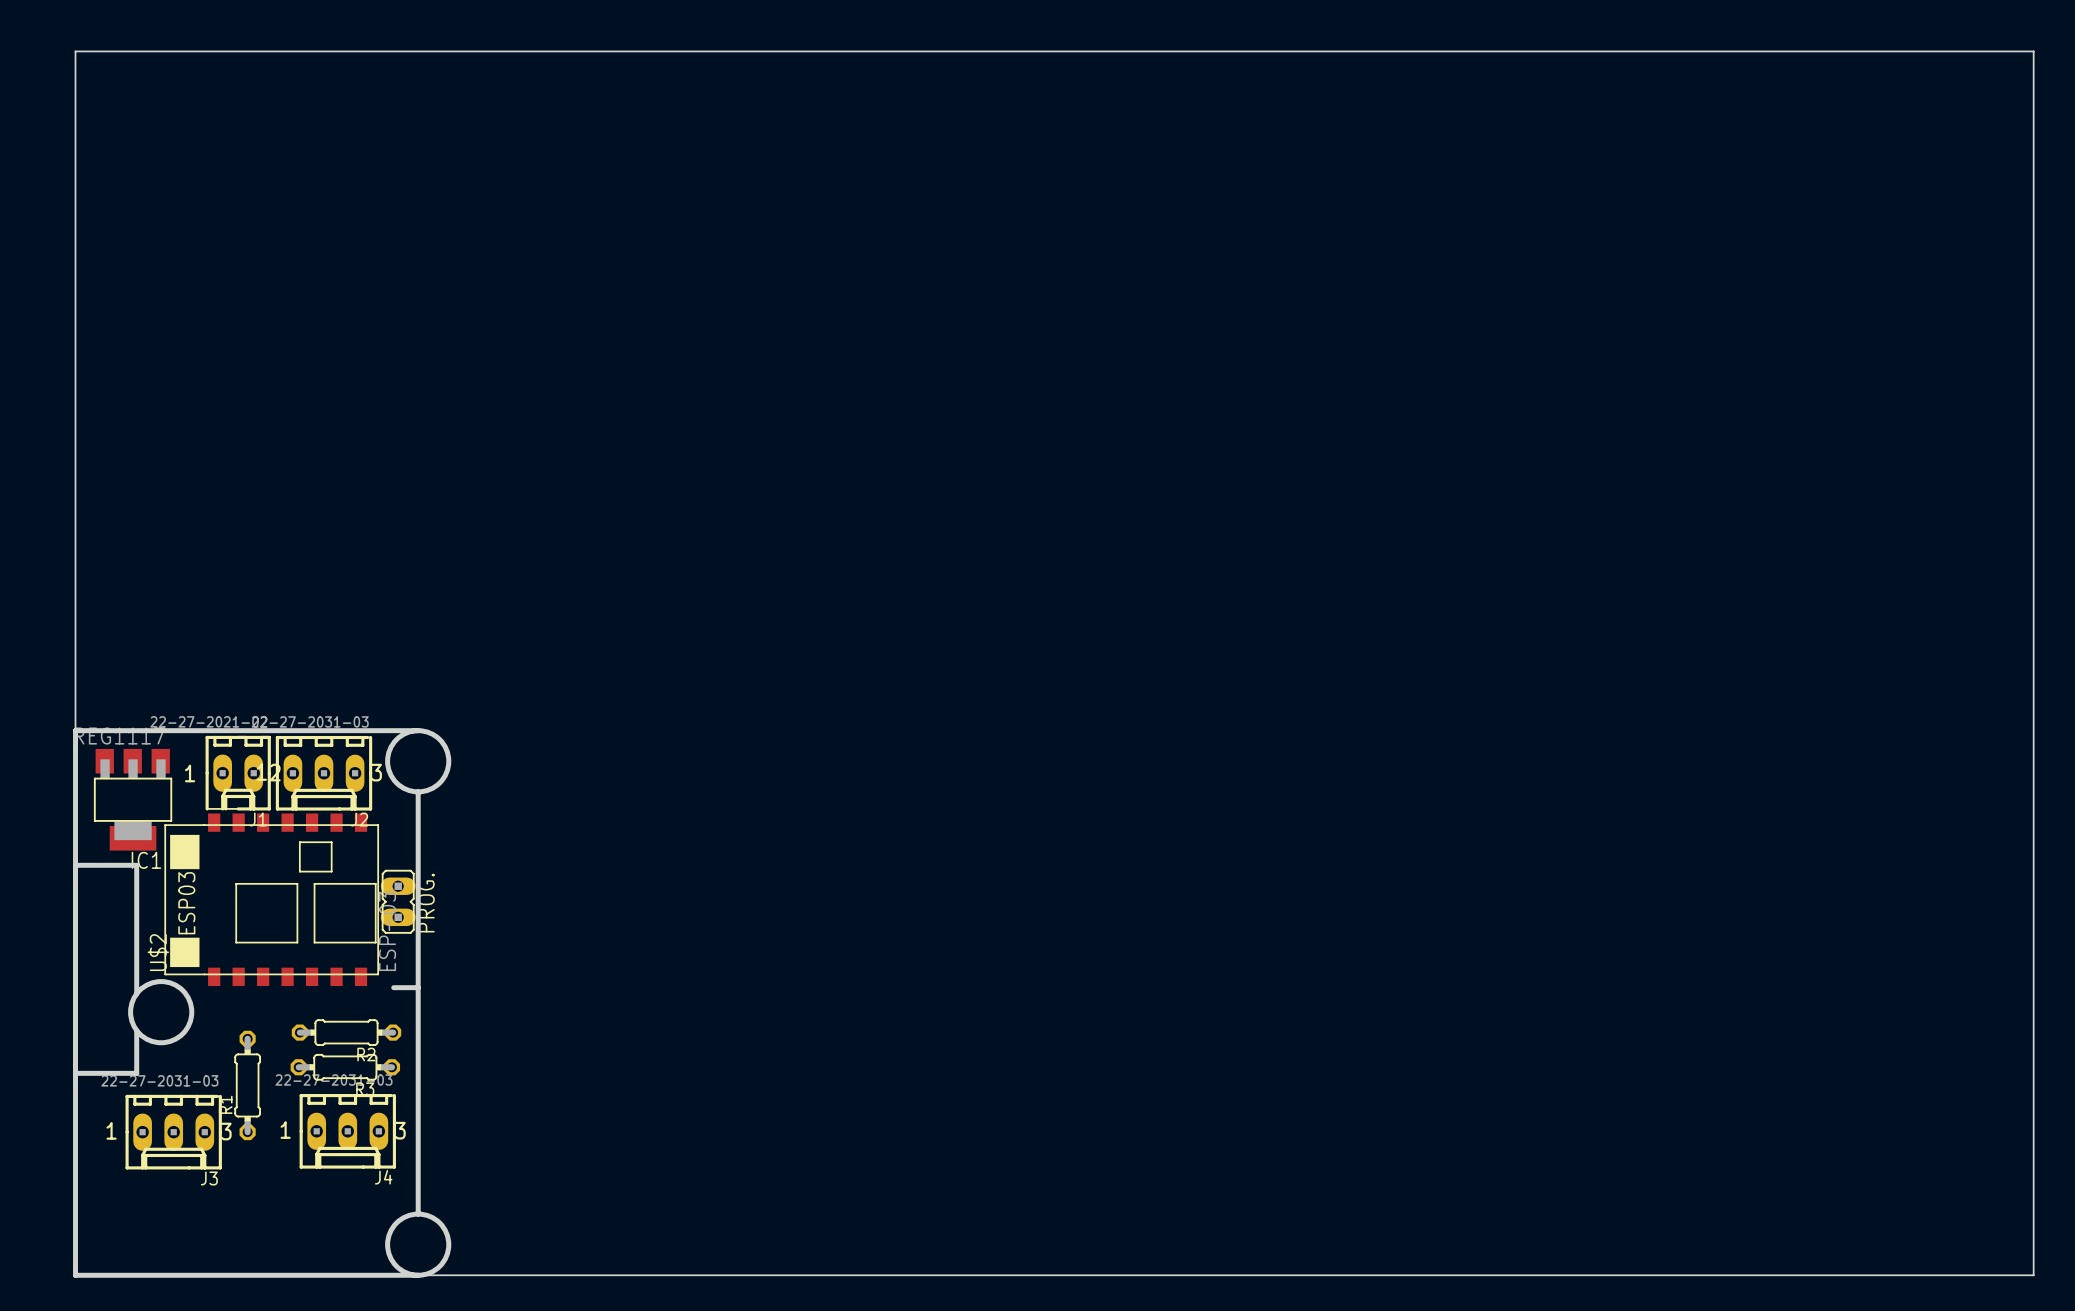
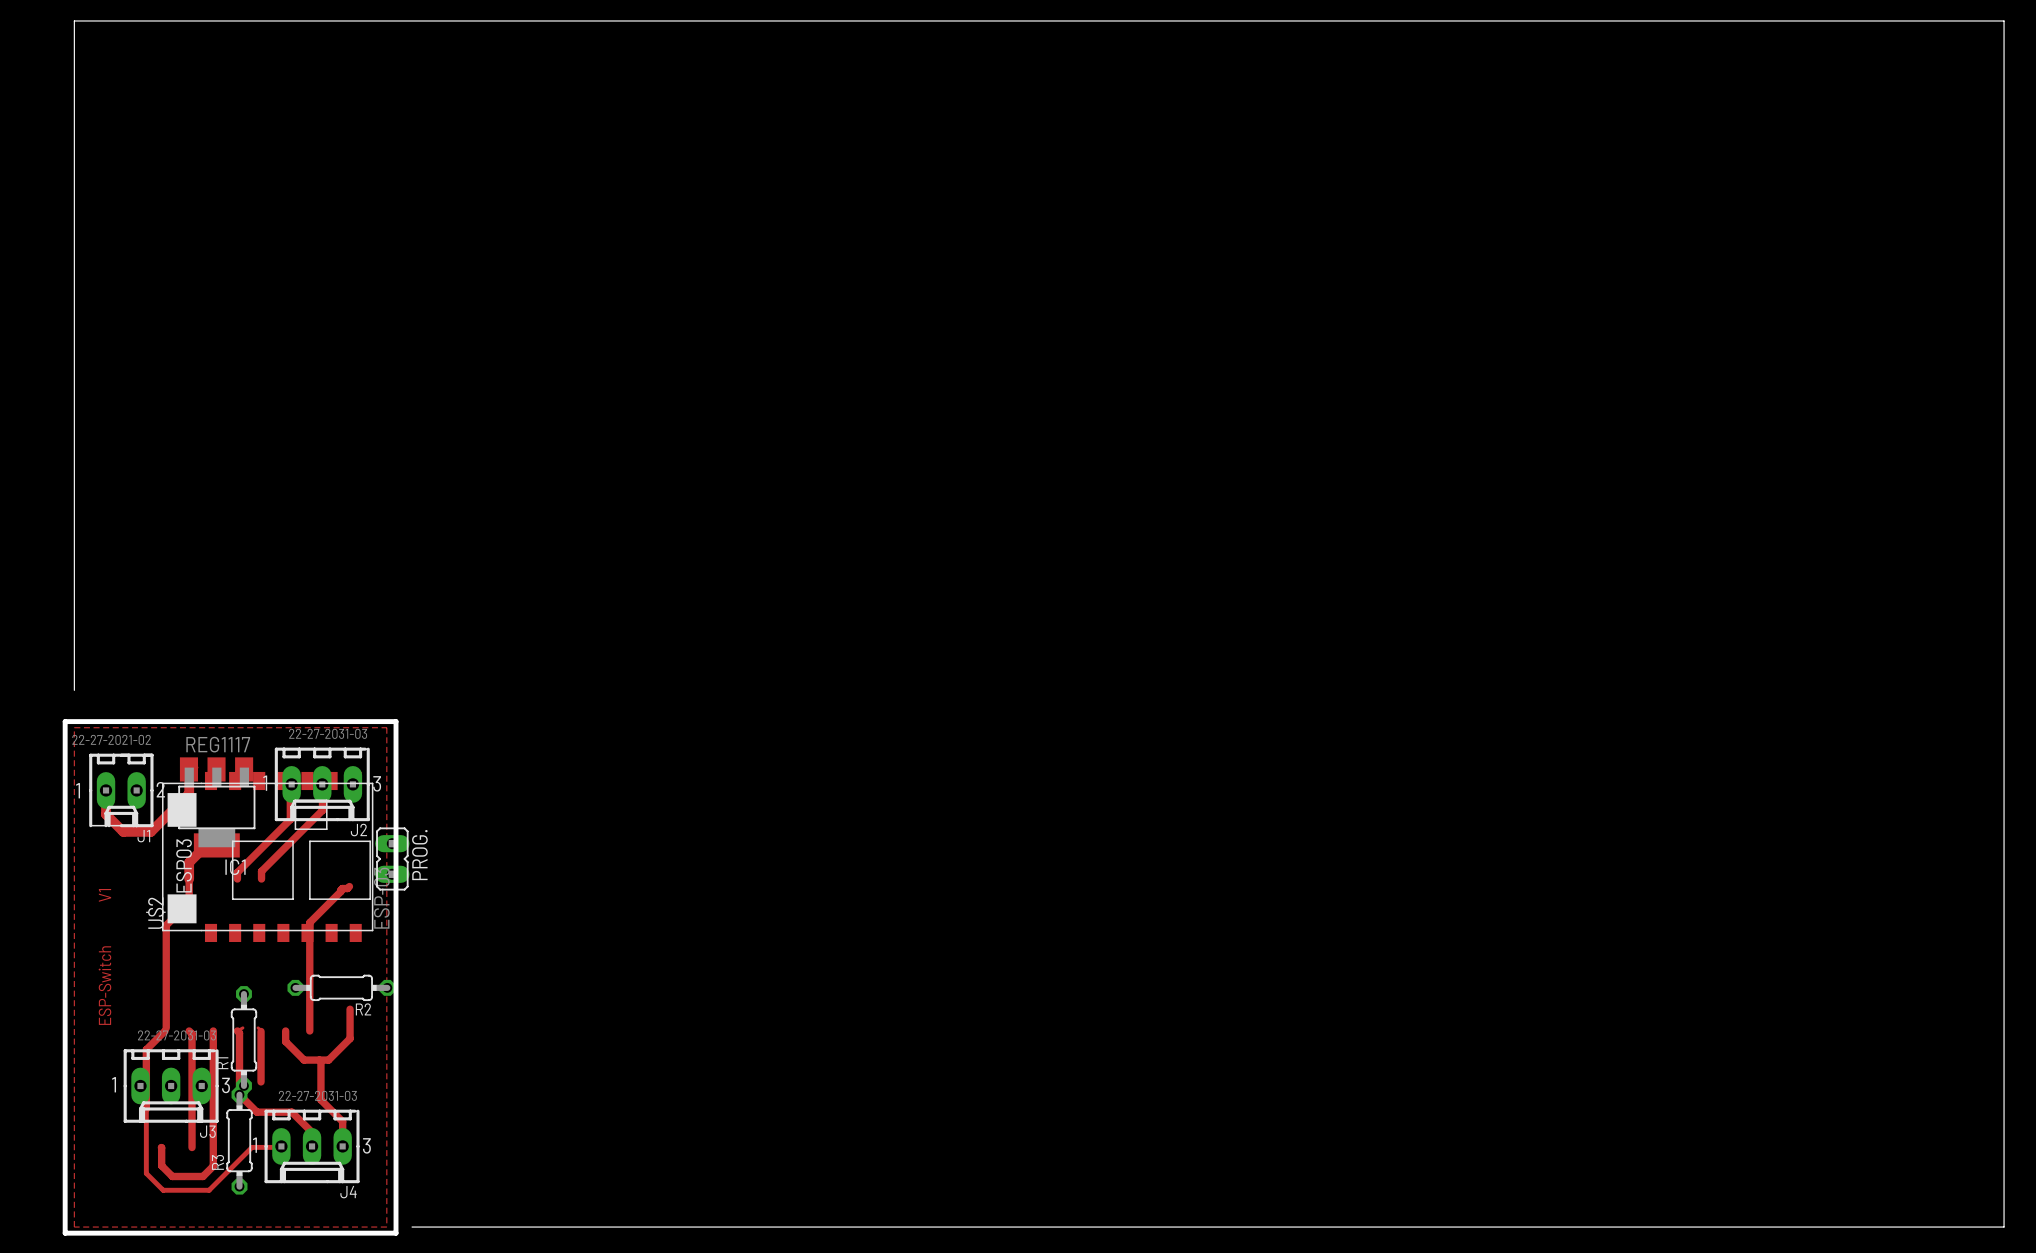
round board edge: [385, 728, 452, 795] -> none
board edge: (418, 730) (75, 730) (75, 1275) (418, 1275) -> none
board edge: none -> (65, 721) (396, 721) (396, 1233) (65, 1233) (65, 721)
zone outline: none -> (74, 727) (386, 727) (386, 1227) (74, 1227) (74, 727)
J1 position: (238, 773) -> (121, 790)
J2 position: (324, 773) -> (322, 784)
board edge: (418, 791) (418, 1214) -> none
IC1 position: (133, 799) -> (216, 807)
track: none -> (196, 767) (188, 769) (189, 793) (150, 831) (123, 831) (106, 814) (106, 790)
track: none -> (291, 784) (290, 819) (237, 872) (237, 879)
track: none -> (322, 784) (322, 810) (261, 871) (261, 879)
board edge: (75, 865) (136, 865) (136, 993) -> none
track: none -> (207, 844) (189, 862) (189, 902) (166, 925) (166, 1027) (146, 1049) (146, 1173) (163, 1190) (209, 1190) (252, 1147) (281, 1146)
track: none -> (349, 886) (342, 888) (309, 922) (309, 1030)
text: none -> V1 (104, 895)
round board edge: [128, 979, 195, 1046] -> none
board edge: (393, 987) (418, 987) -> none
text: none -> ESP-Switch (104, 985)
board edge: (136, 1030) (136, 1073) (75, 1073) -> none
track: none -> (349, 1009) (350, 1038) (328, 1060) (304, 1060) (285, 1041) (285, 1030)
R3 rotation: 0° (345, 1067) -> 90° clockwise (239, 1140)
R3 position: (345, 1067) -> (239, 1140)
track: none -> (242, 1027) (237, 1030) (239, 1033) (239, 1094) (256, 1112) (291, 1112) (312, 1132) (312, 1146)
track: none -> (258, 1027) (261, 1030) (261, 1081)
track: none -> (189, 1030) (192, 1033) (192, 1147)
track: none -> (213, 1030) (213, 1166) (203, 1176) (172, 1176) (161, 1165) (161, 1147)
track: none -> (319, 1060) (320, 1099) (342, 1121) (342, 1146)
J4 position: (347, 1131) -> (312, 1146)
round board edge: [385, 1211, 452, 1278] -> none

